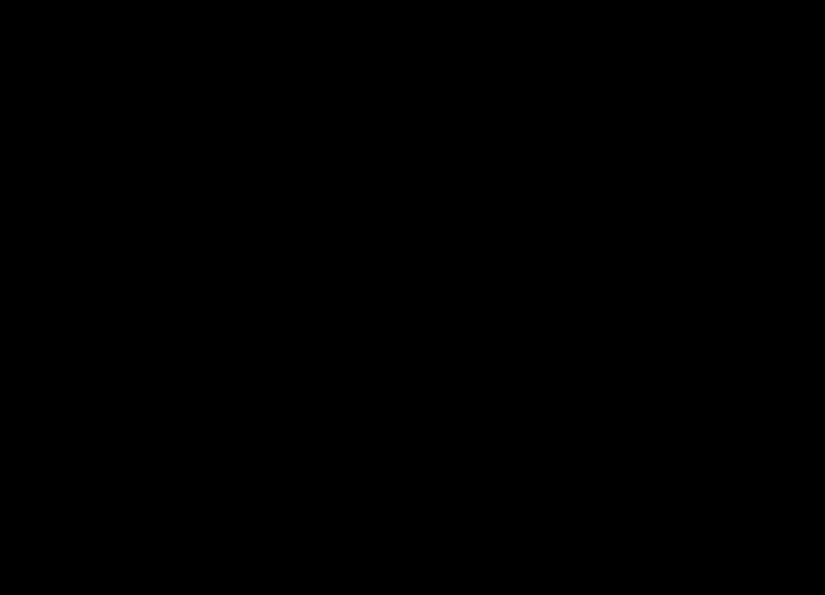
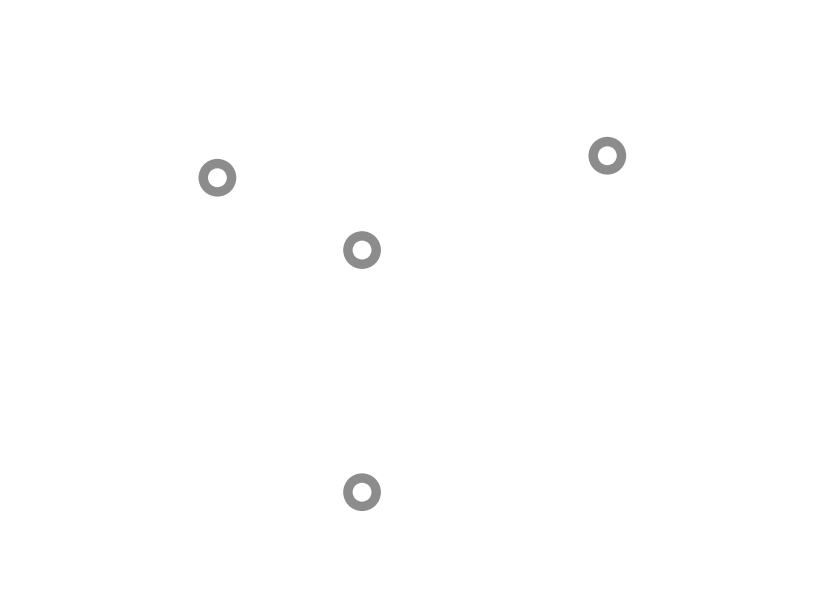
via: none -> (607, 155)
via: none -> (217, 177)
via: none -> (362, 250)
via: none -> (362, 492)

